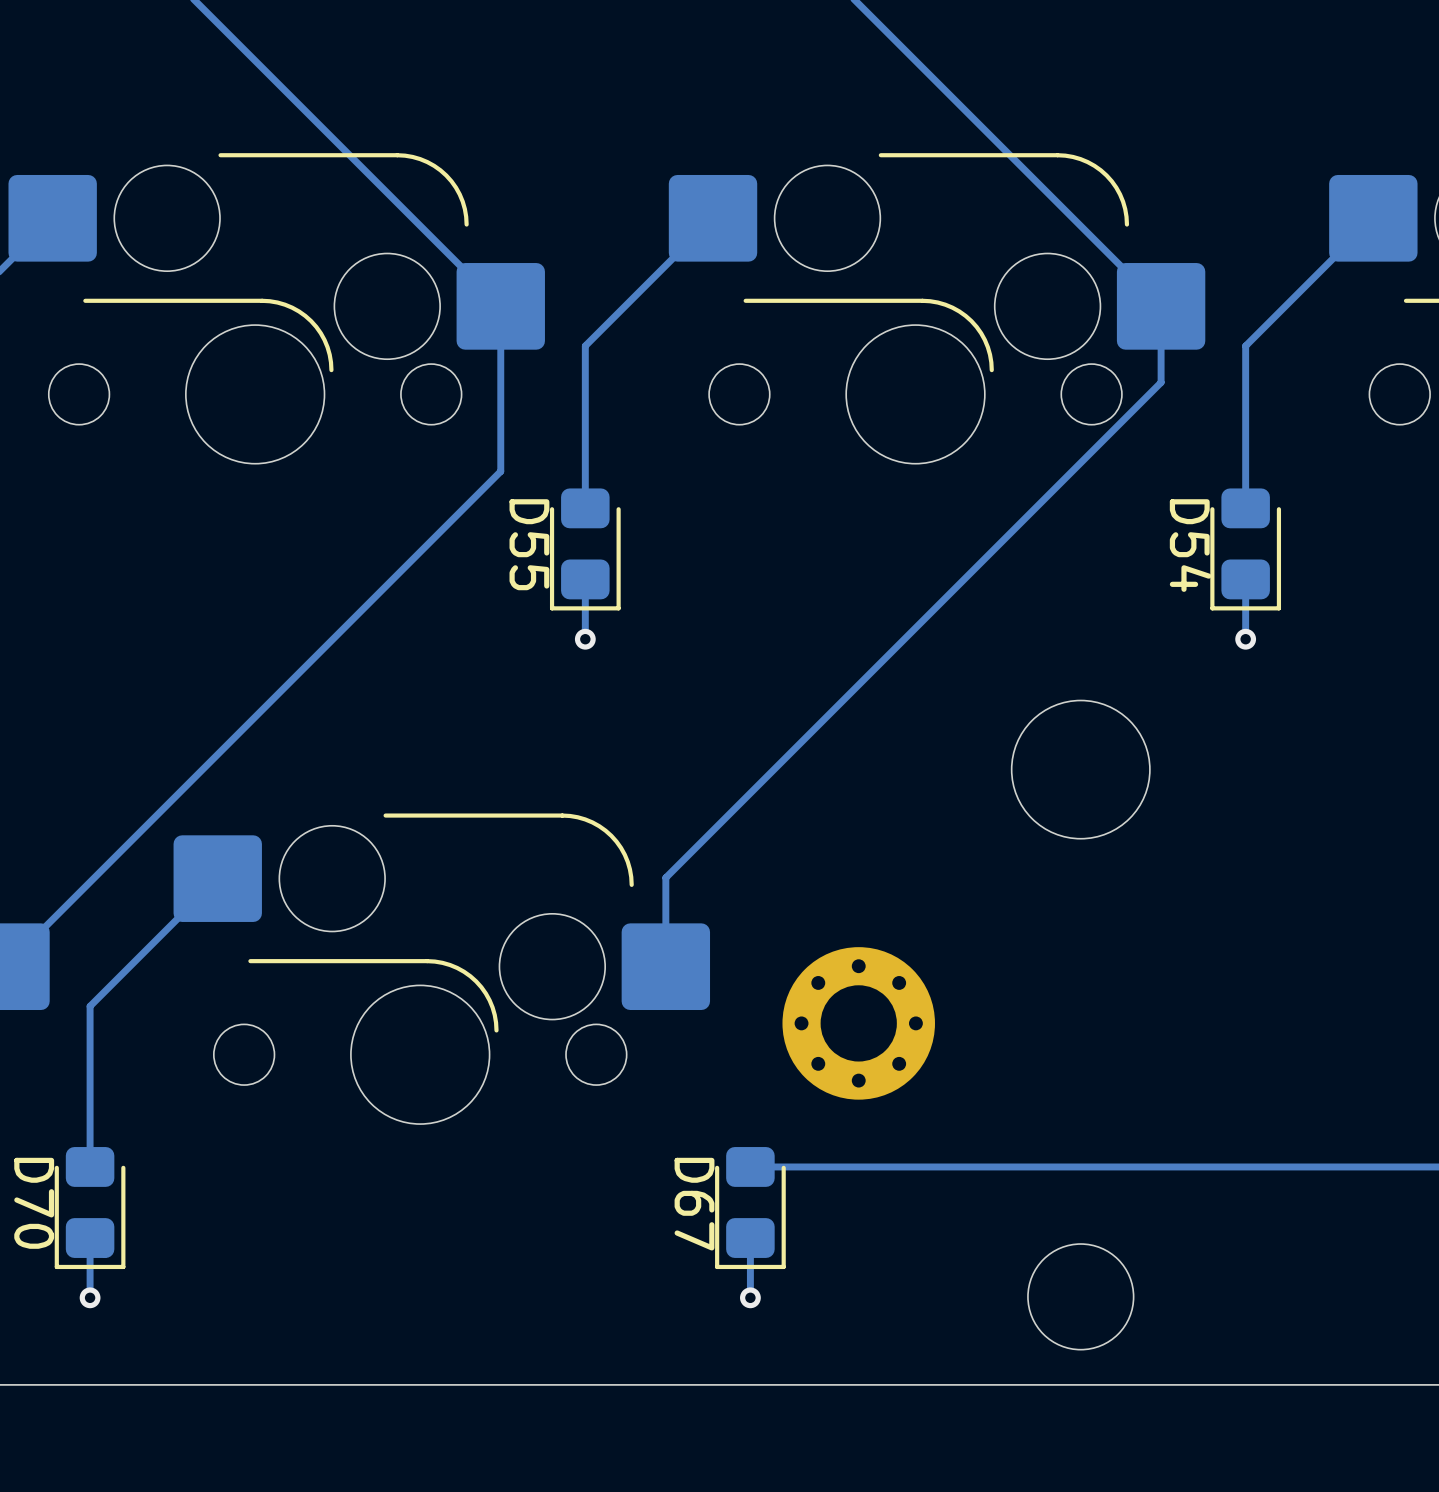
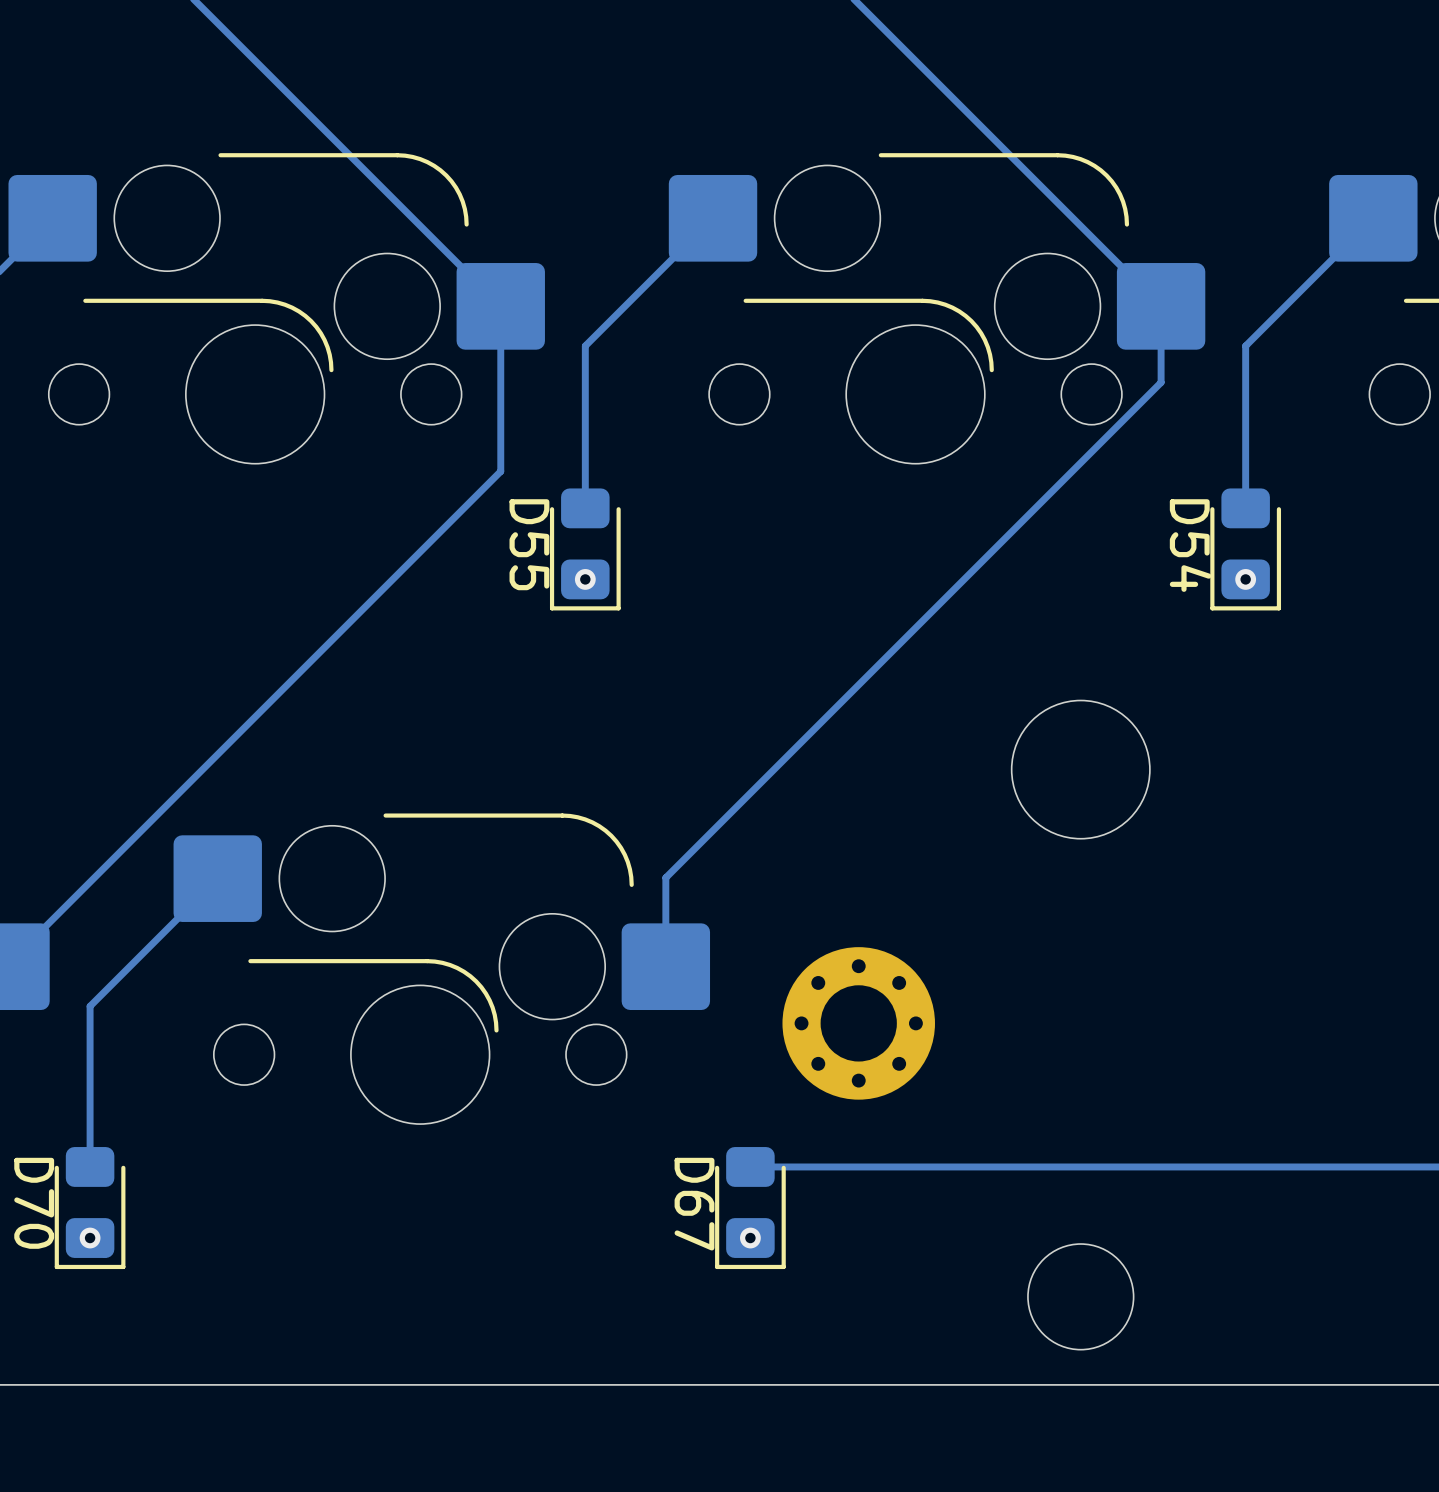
track: (1245, 581) (1245, 639) -> none
track: (585, 582) (585, 639) -> none
via position: (585, 639) -> (585, 579)
via position: (1245, 639) -> (1245, 579)
track: (90, 1239) (90, 1297) -> none
track: (750, 1241) (750, 1297) -> none
via position: (90, 1297) -> (90, 1238)
via position: (750, 1297) -> (750, 1238)

